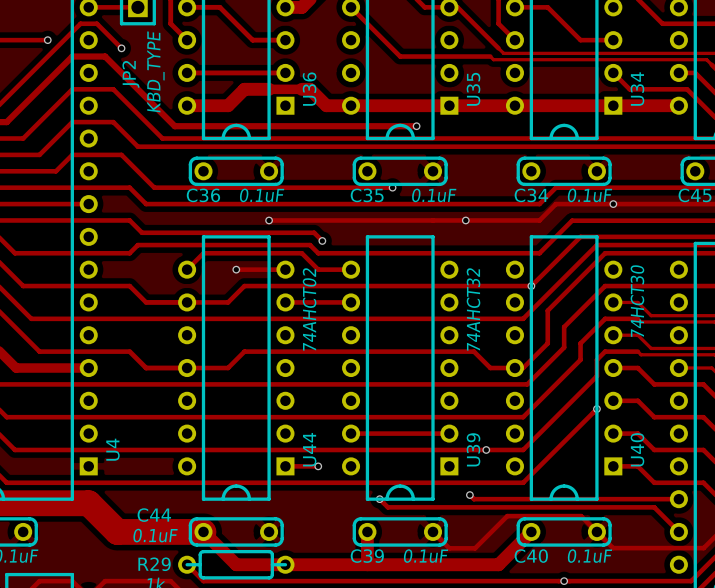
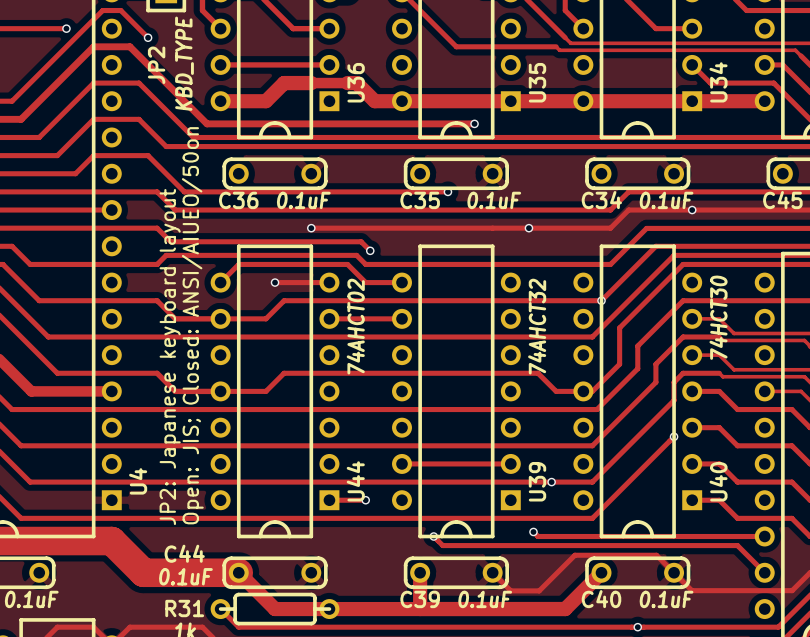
text: none -> Open: JIS; Closed: ANSI/AIUEO/50on (192, 325)
text: none -> JP2: Japanese keyboard layout (170, 357)
R29 name: R29 (154, 564) -> R31 (184, 608)

